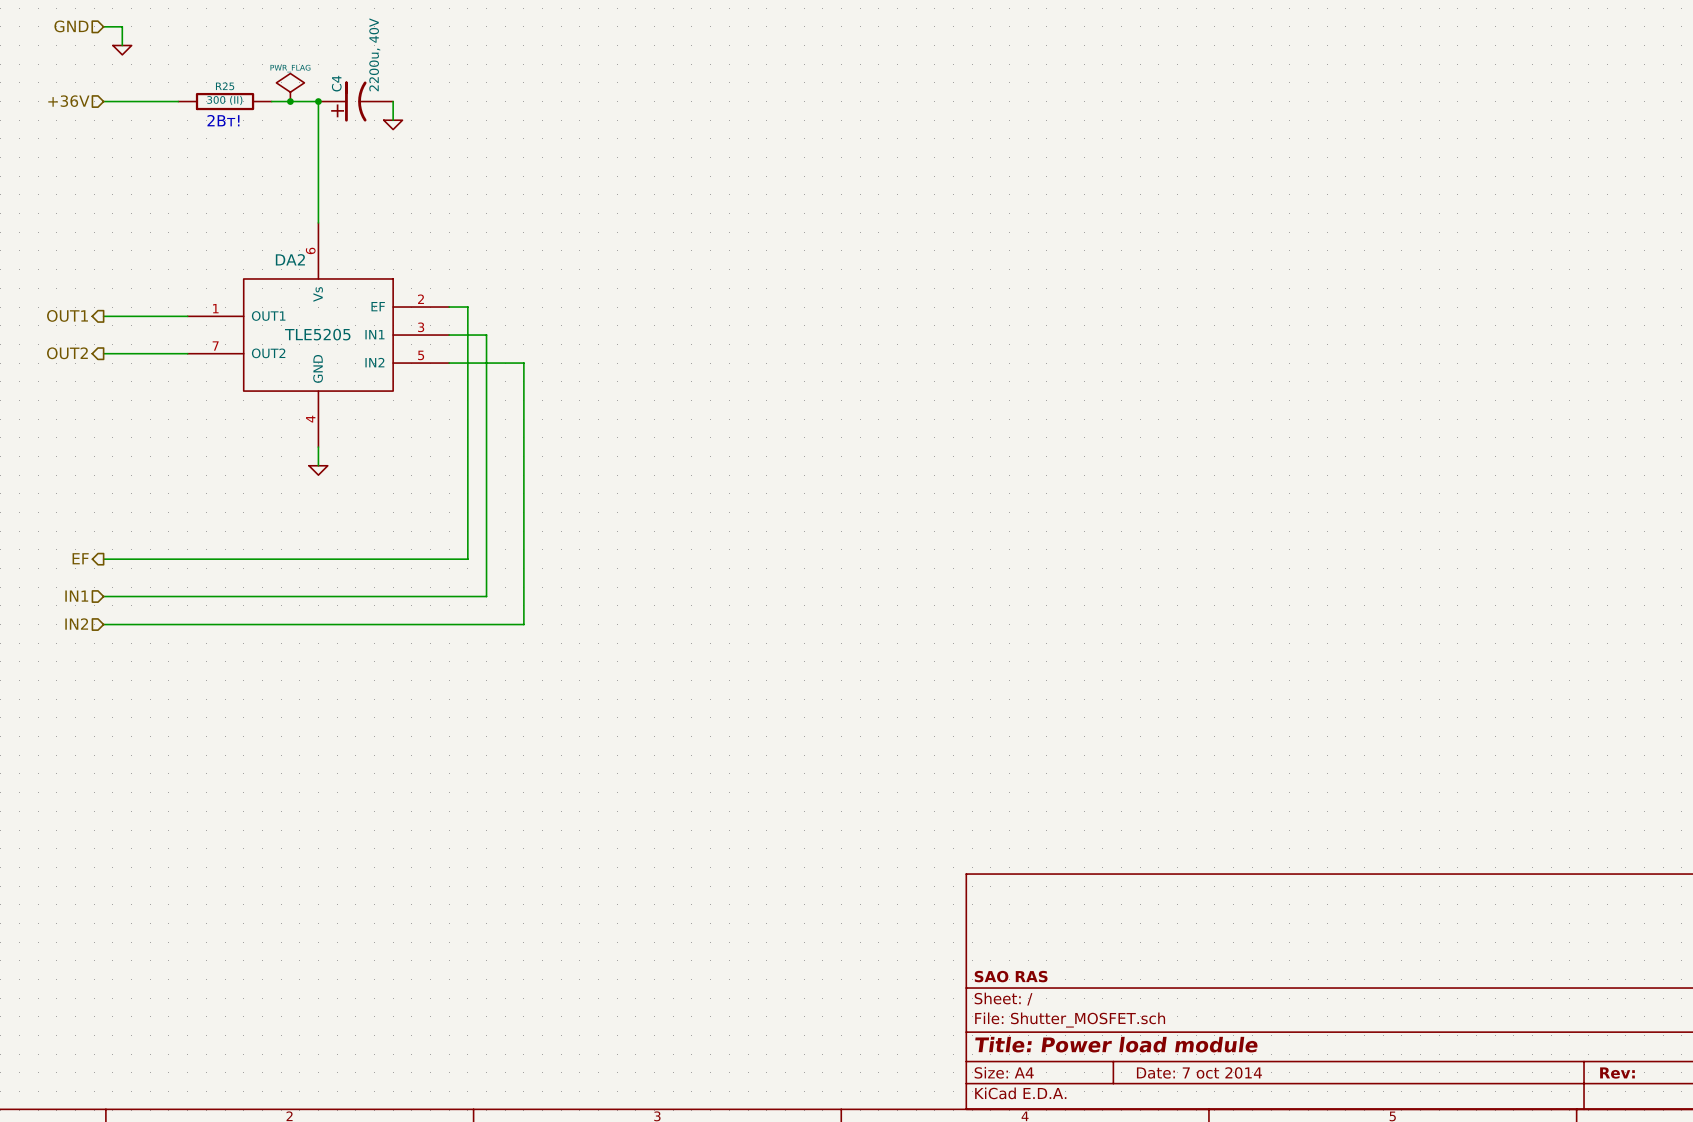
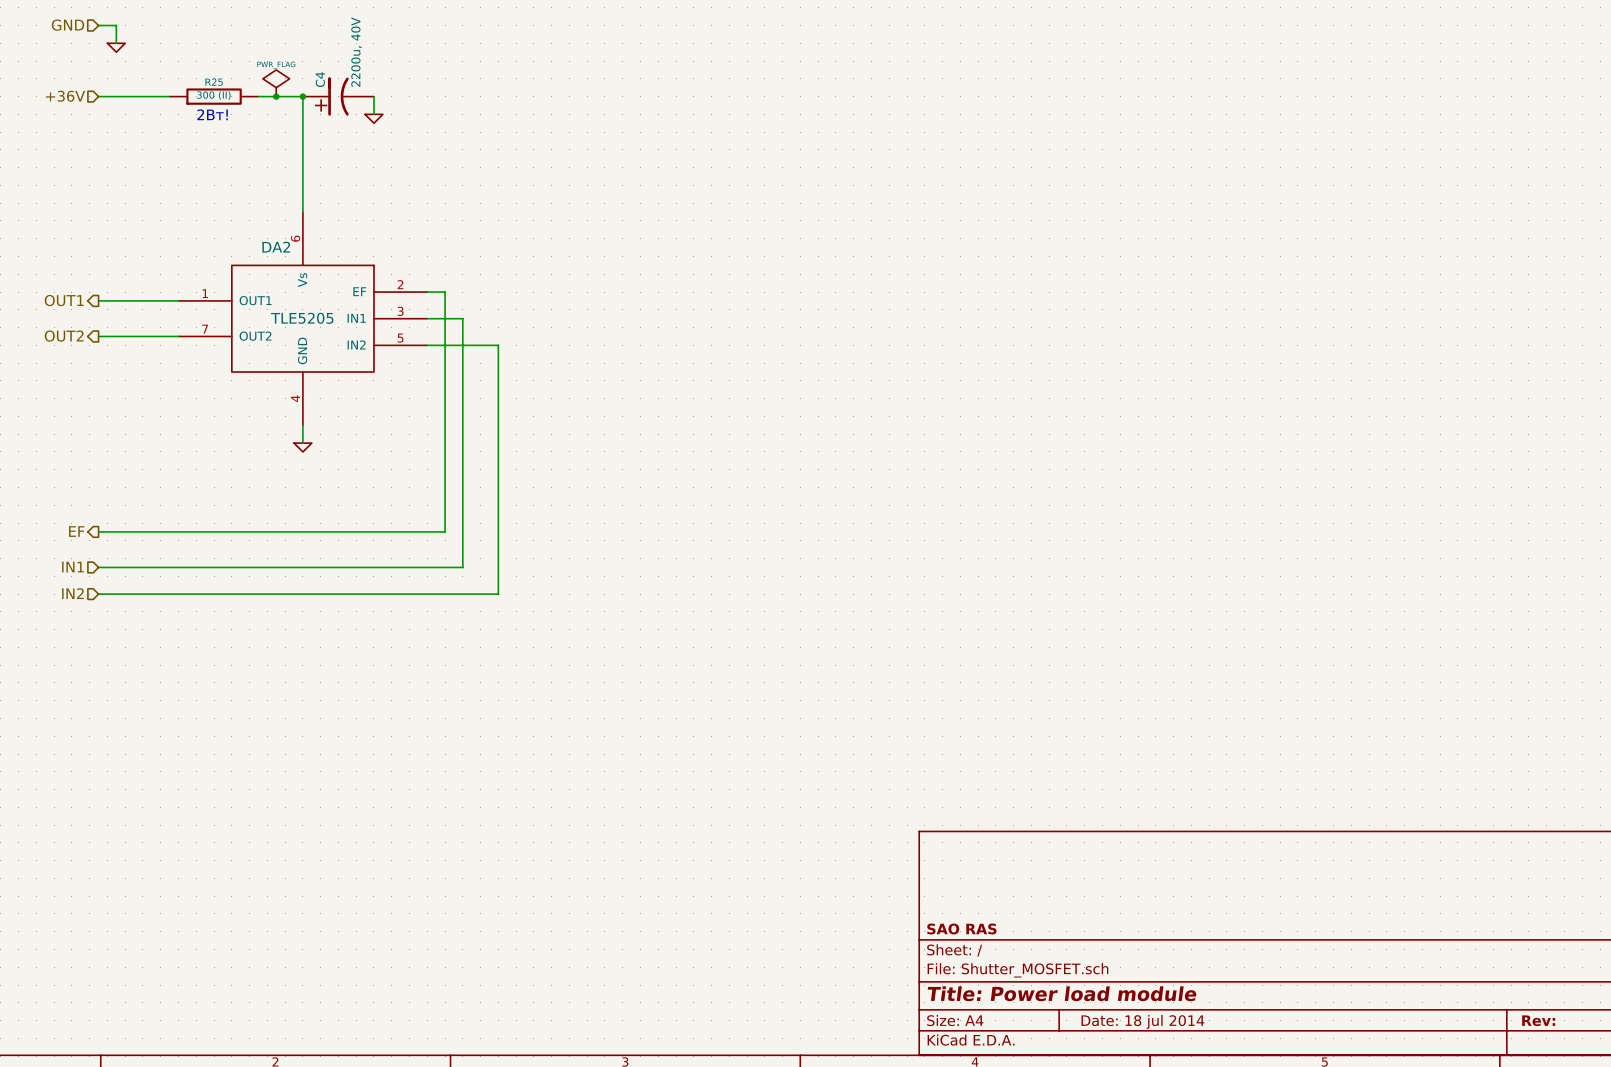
title block: Date: 7 oct 2014 (1199, 1072) -> Date: 18 jul 2014 (1142, 1021)

